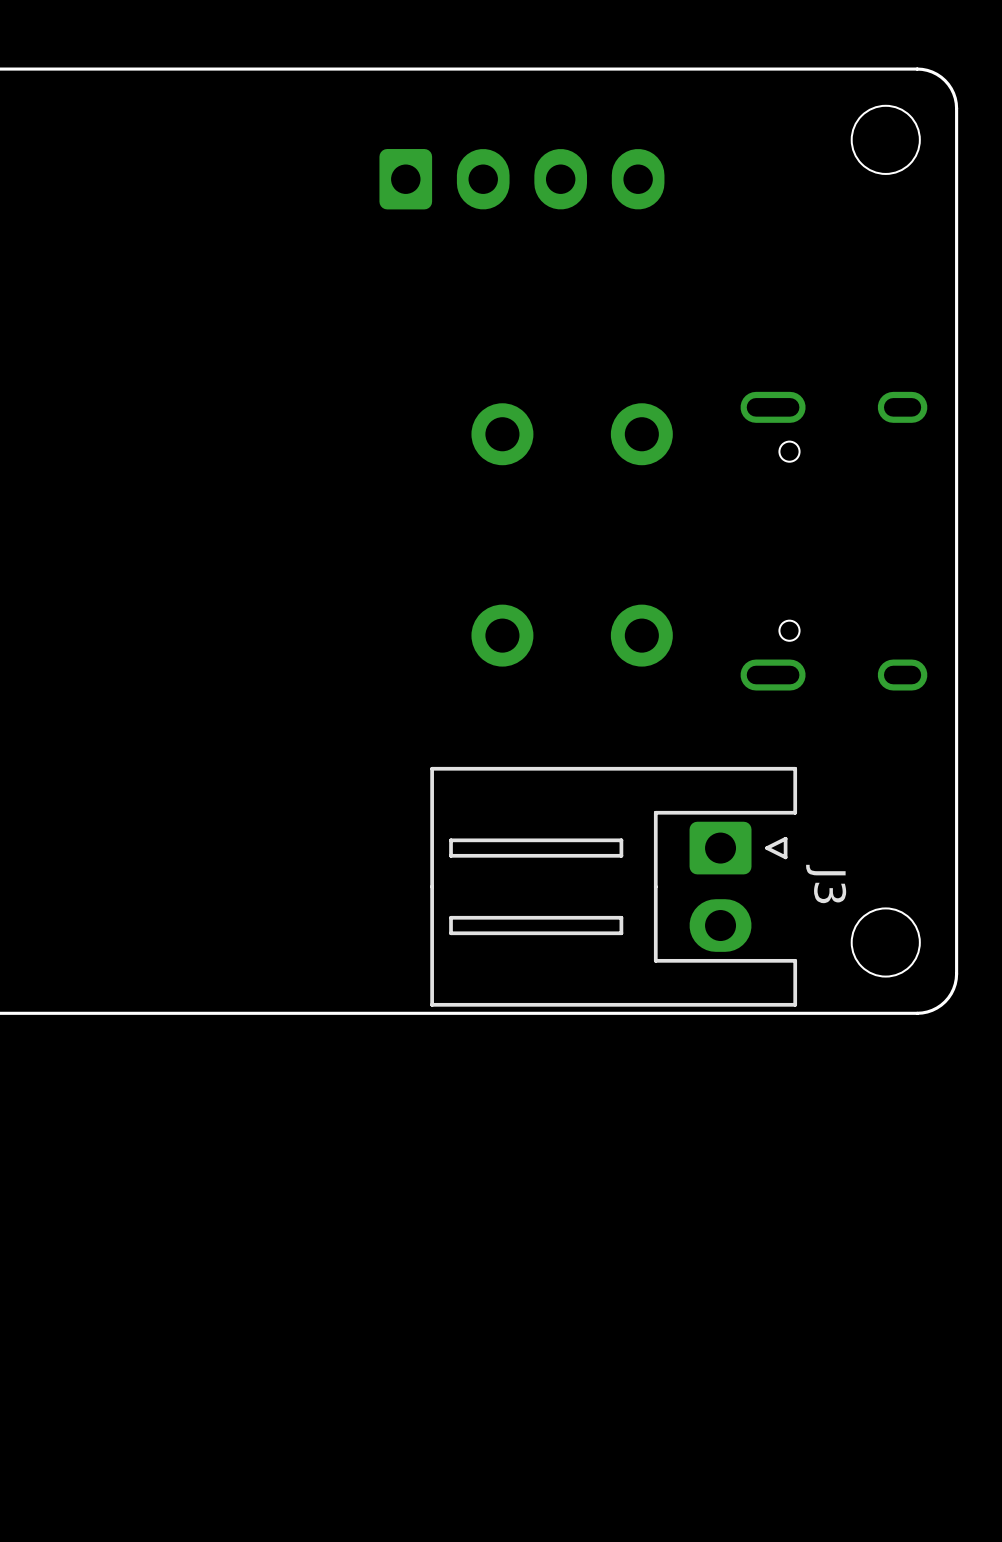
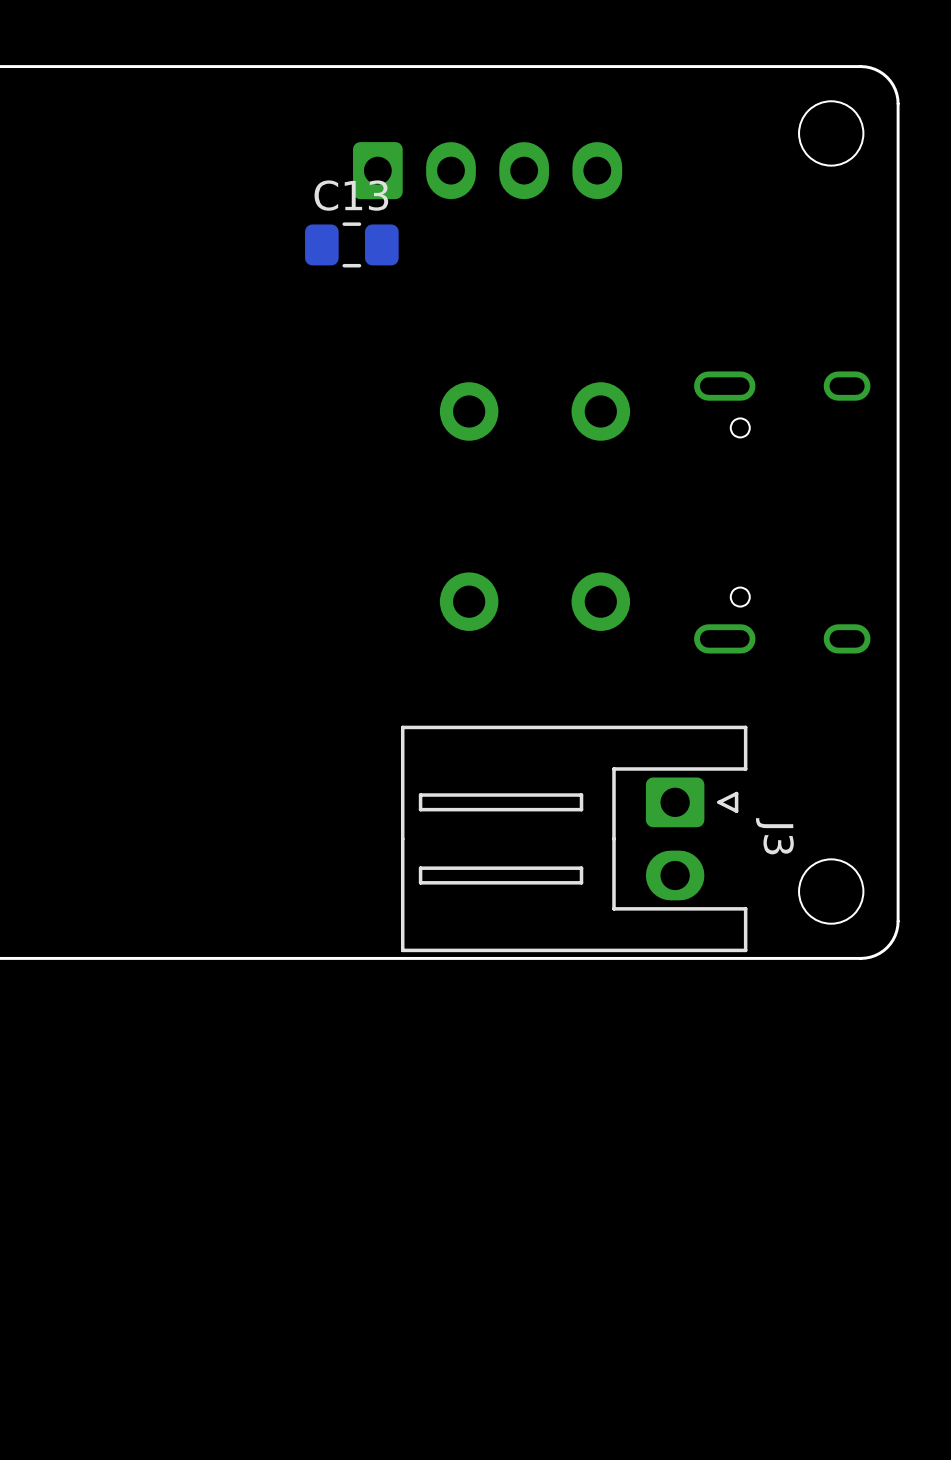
C13: none -> (351, 244)

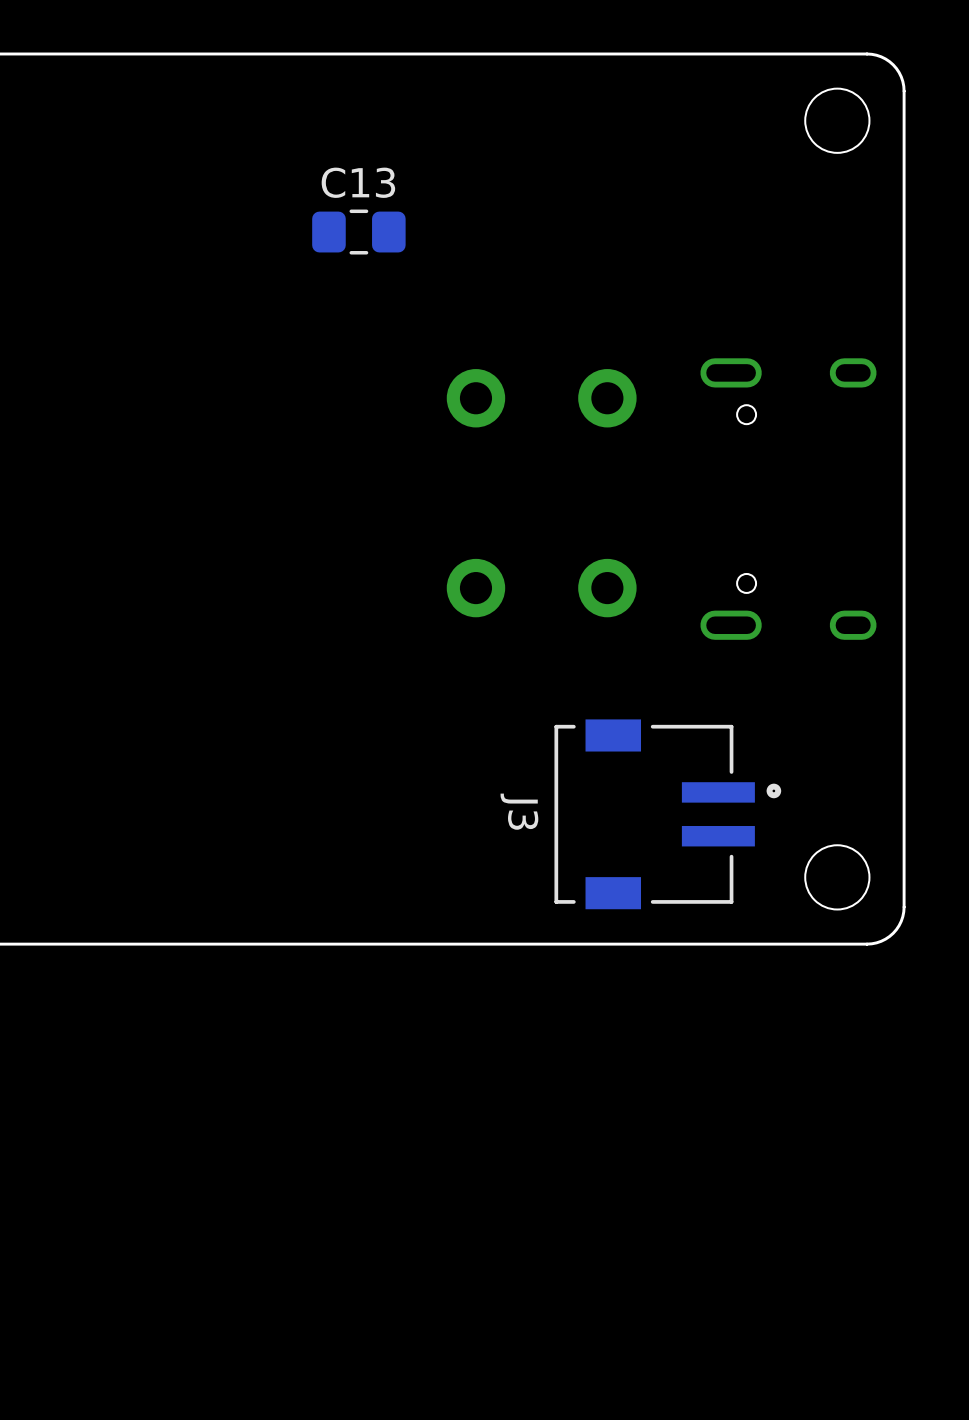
part: (487, 170) -> none
J3 footprint: [400, 725, 748, 953] -> [554, 719, 782, 910]
J3 name position: J3 (774, 836) -> J3 (519, 811)

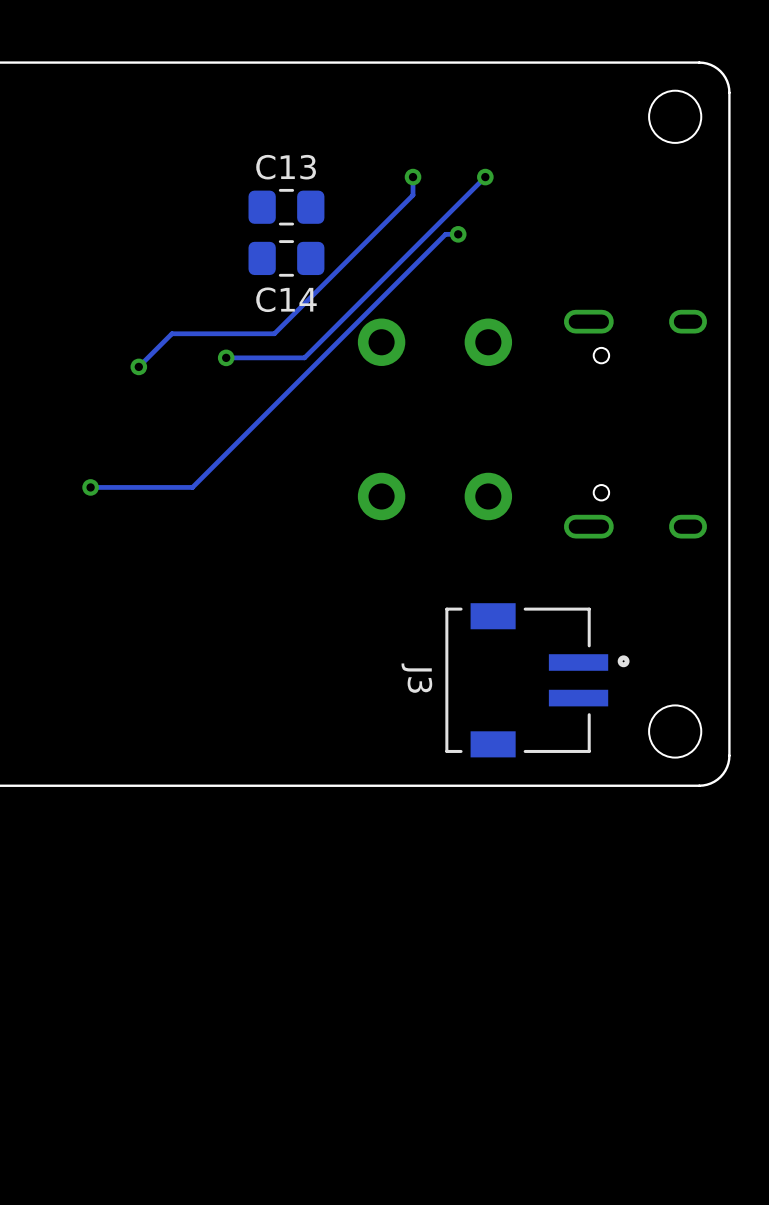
track: none -> (413, 177) (413, 195) (274, 333) (171, 333) (138, 366)
via: none -> (413, 177)
track: none -> (485, 177) (304, 357) (226, 357)
via: none -> (485, 177)
track: none -> (458, 234) (445, 234) (192, 487) (90, 487)
via: none -> (458, 234)
C14: none -> (286, 258)
via: none -> (226, 357)
via: none -> (138, 366)
via: none -> (90, 487)

